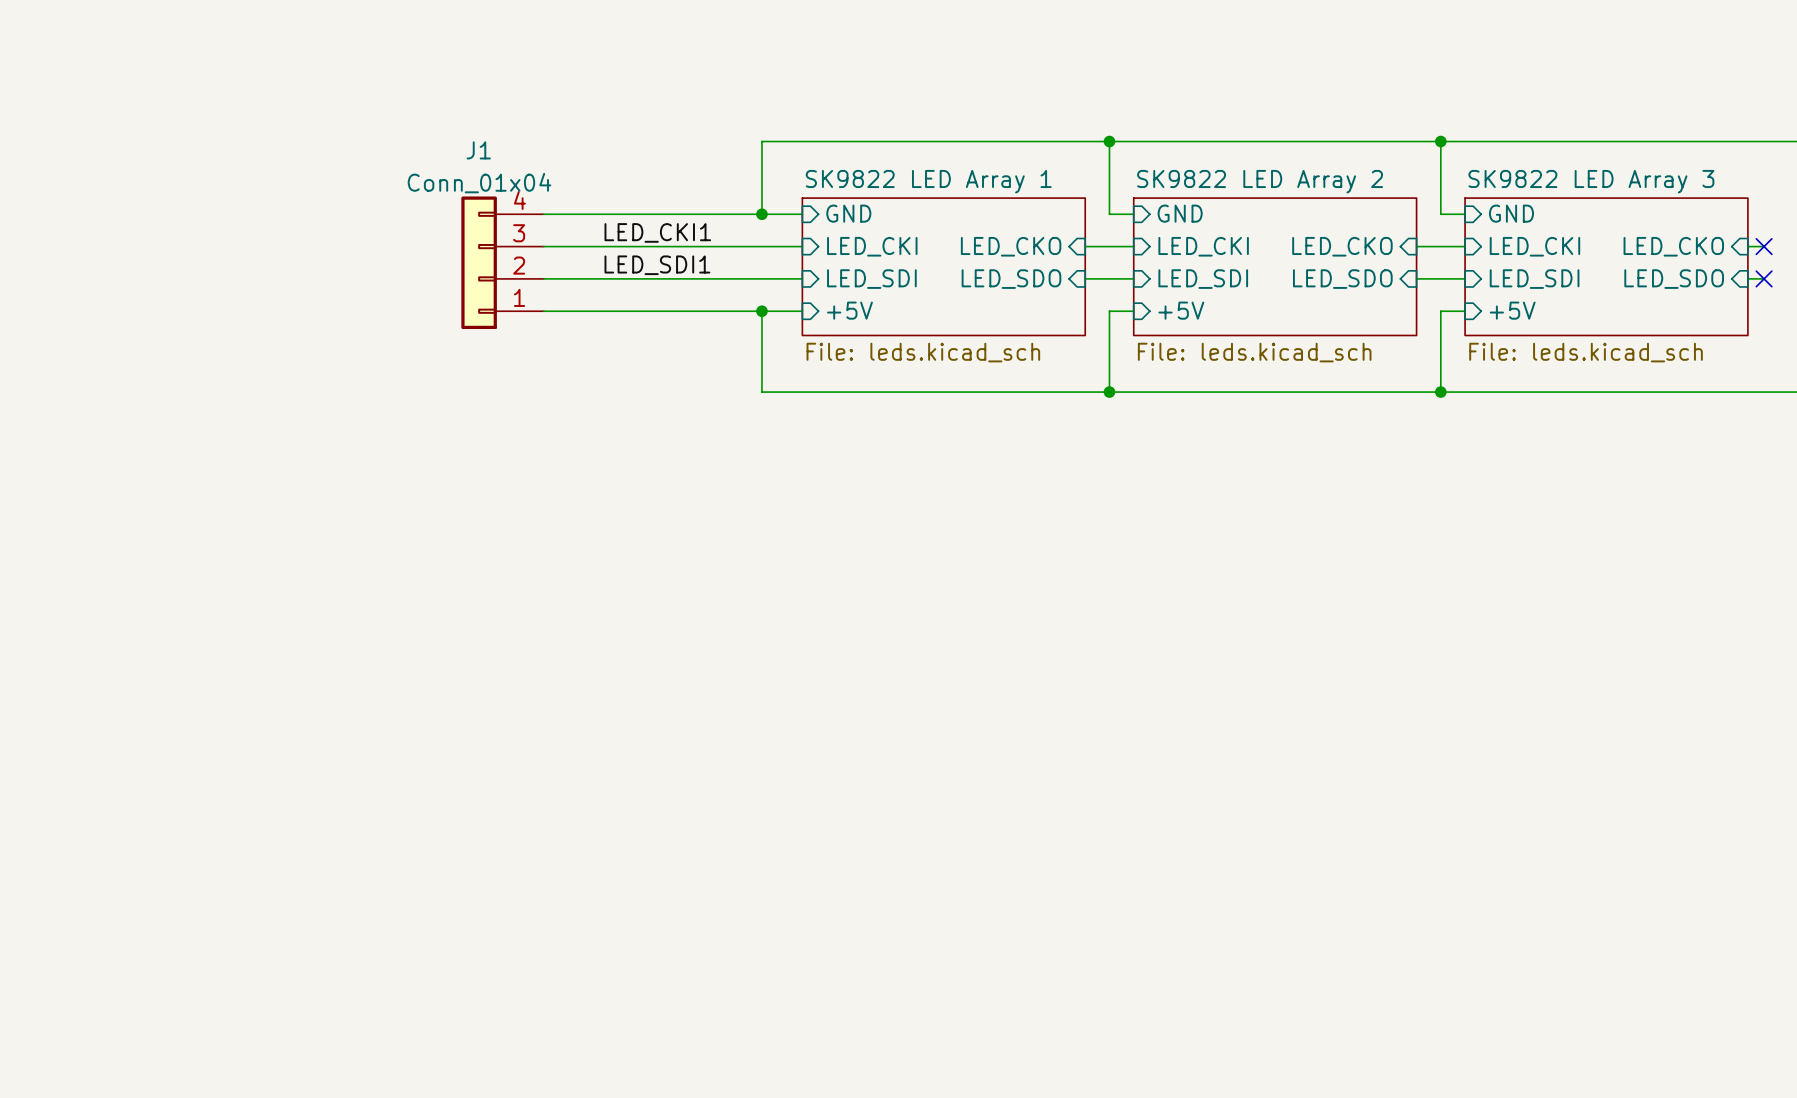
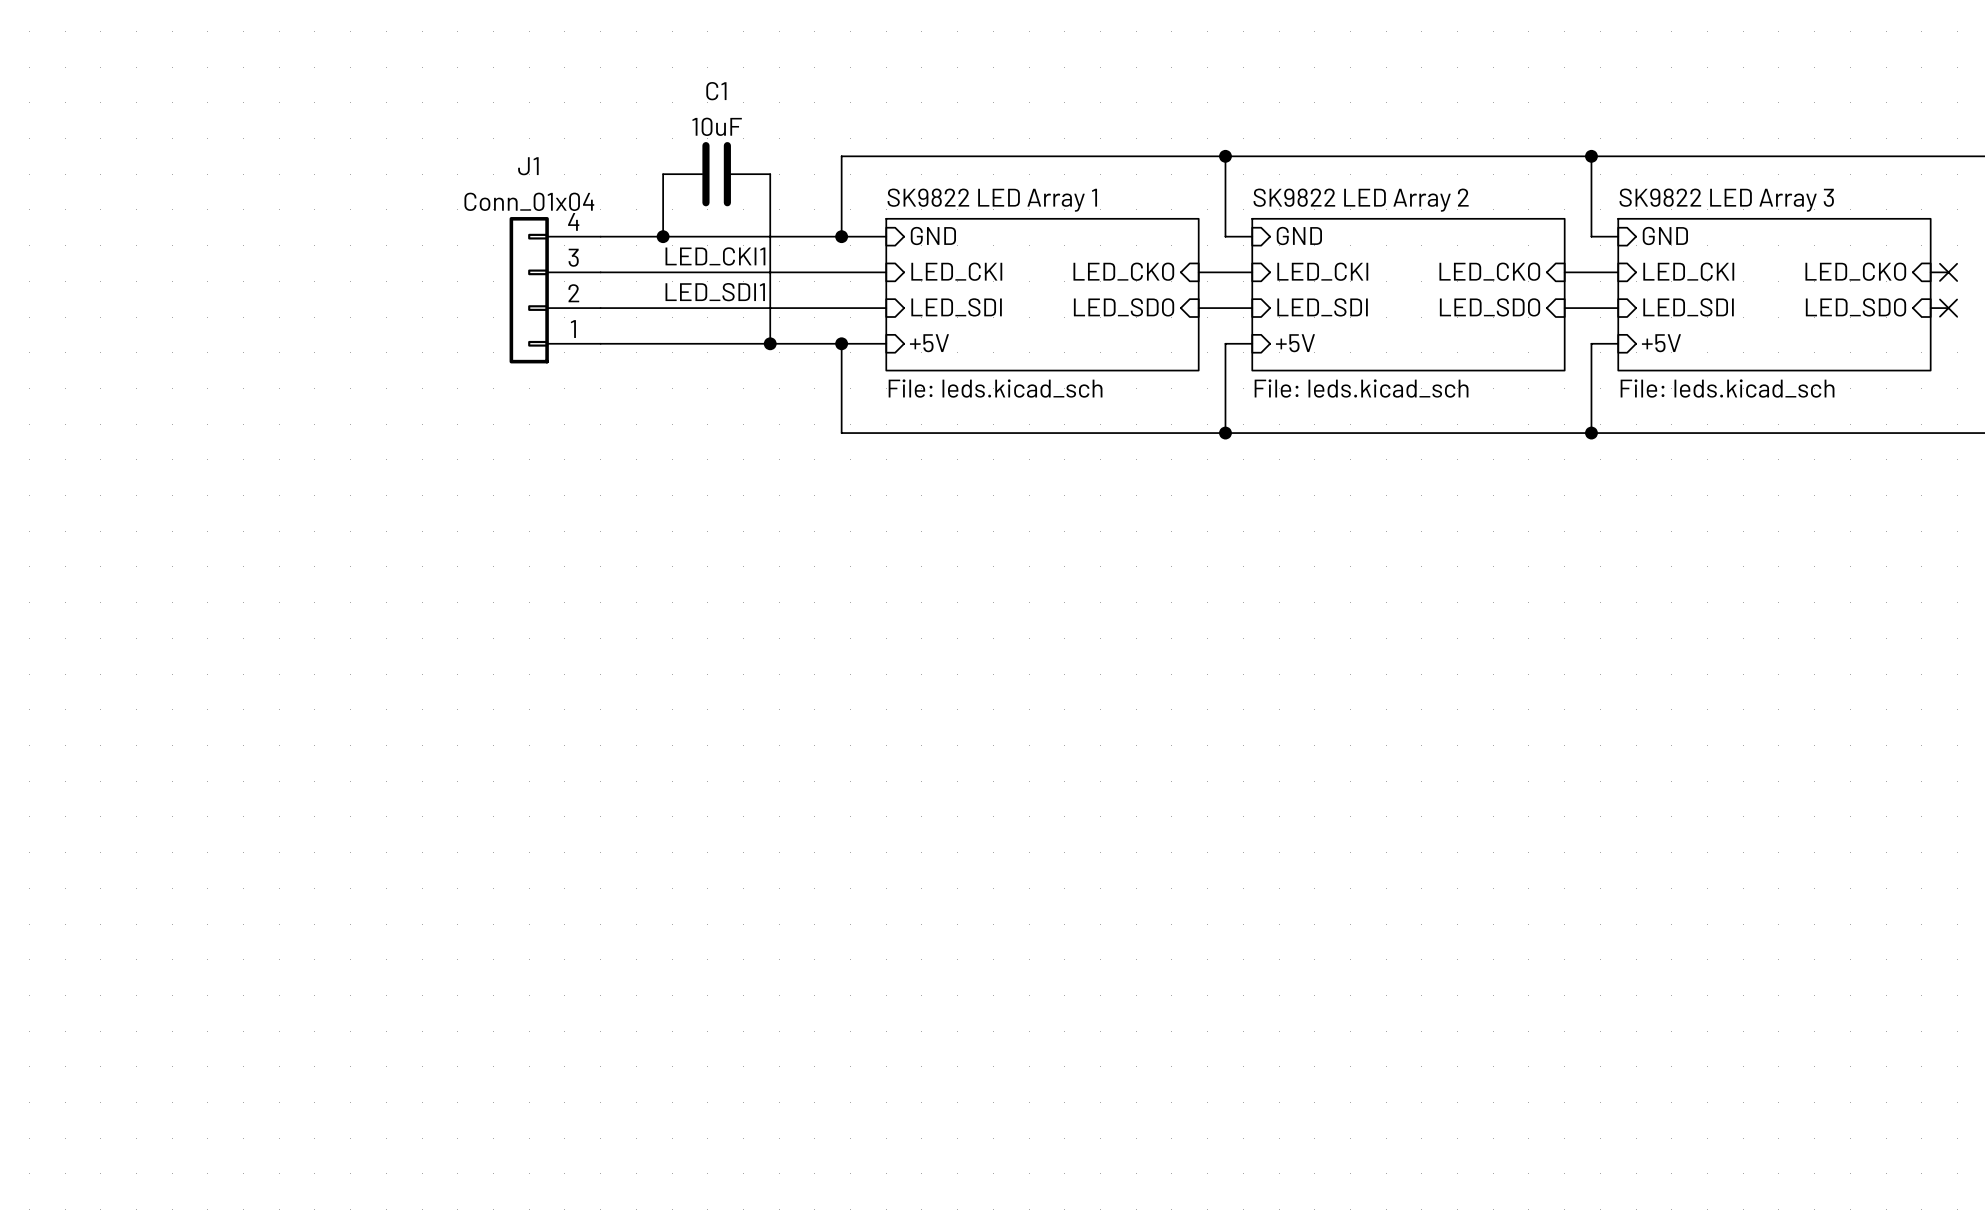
wire: none -> (663, 174) (663, 236)
C1: none -> 10uF (716, 174)
wire: none -> (770, 174) (770, 343)
junction: none -> (663, 236)
junction: none -> (770, 343)

